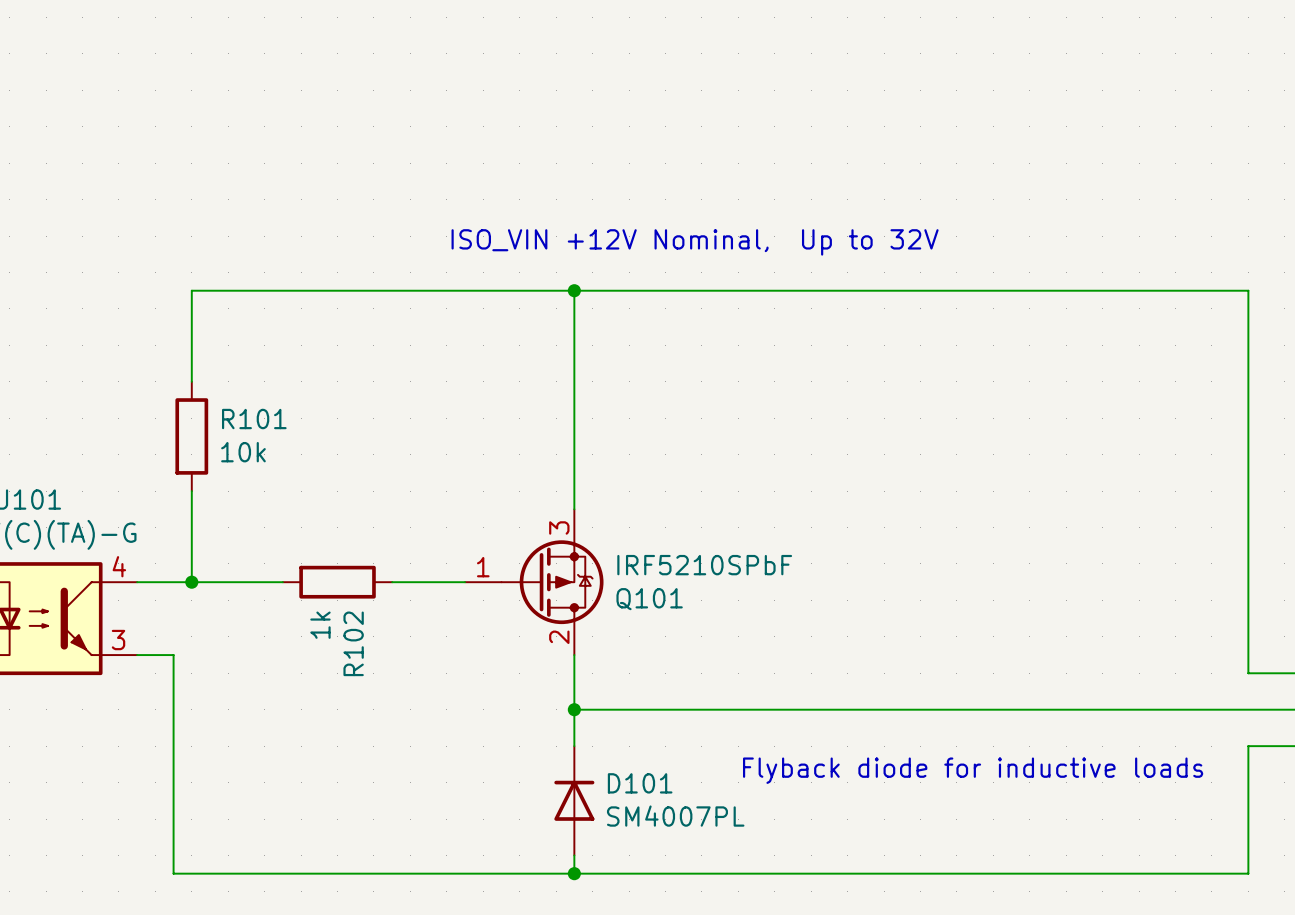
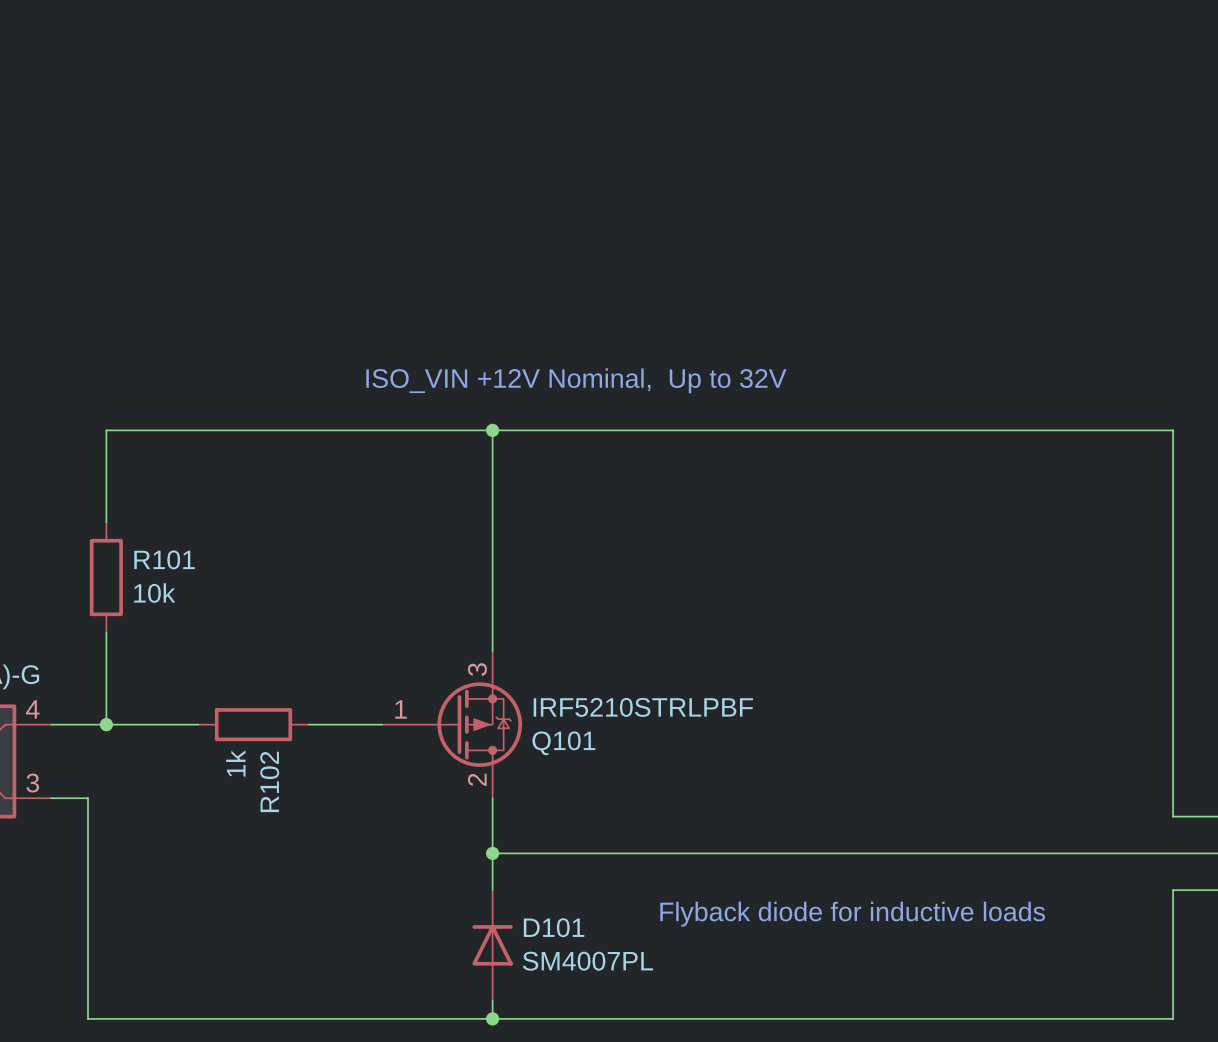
Q101 value: IRF5210SPbF (704, 565) -> IRF5210STRLPBF (643, 707)

